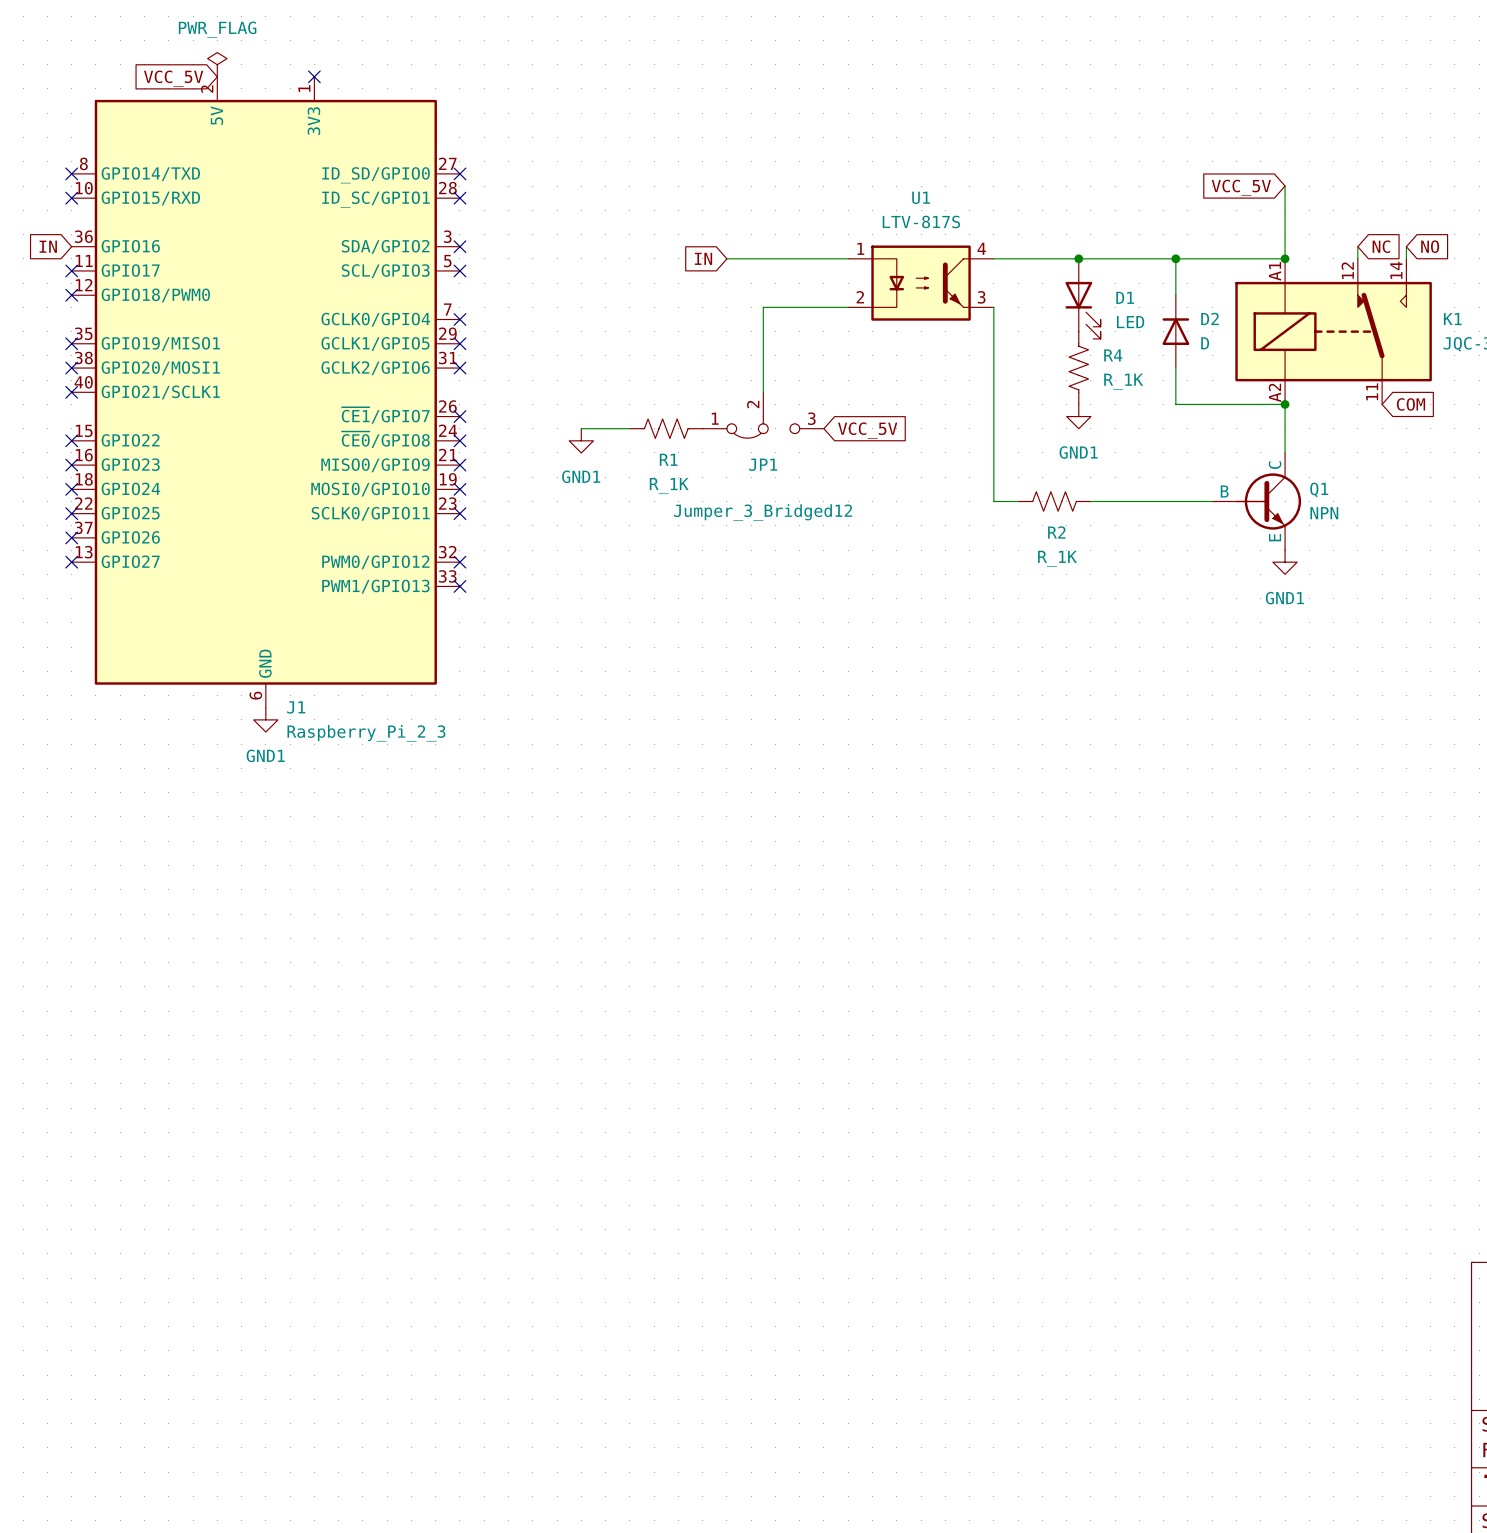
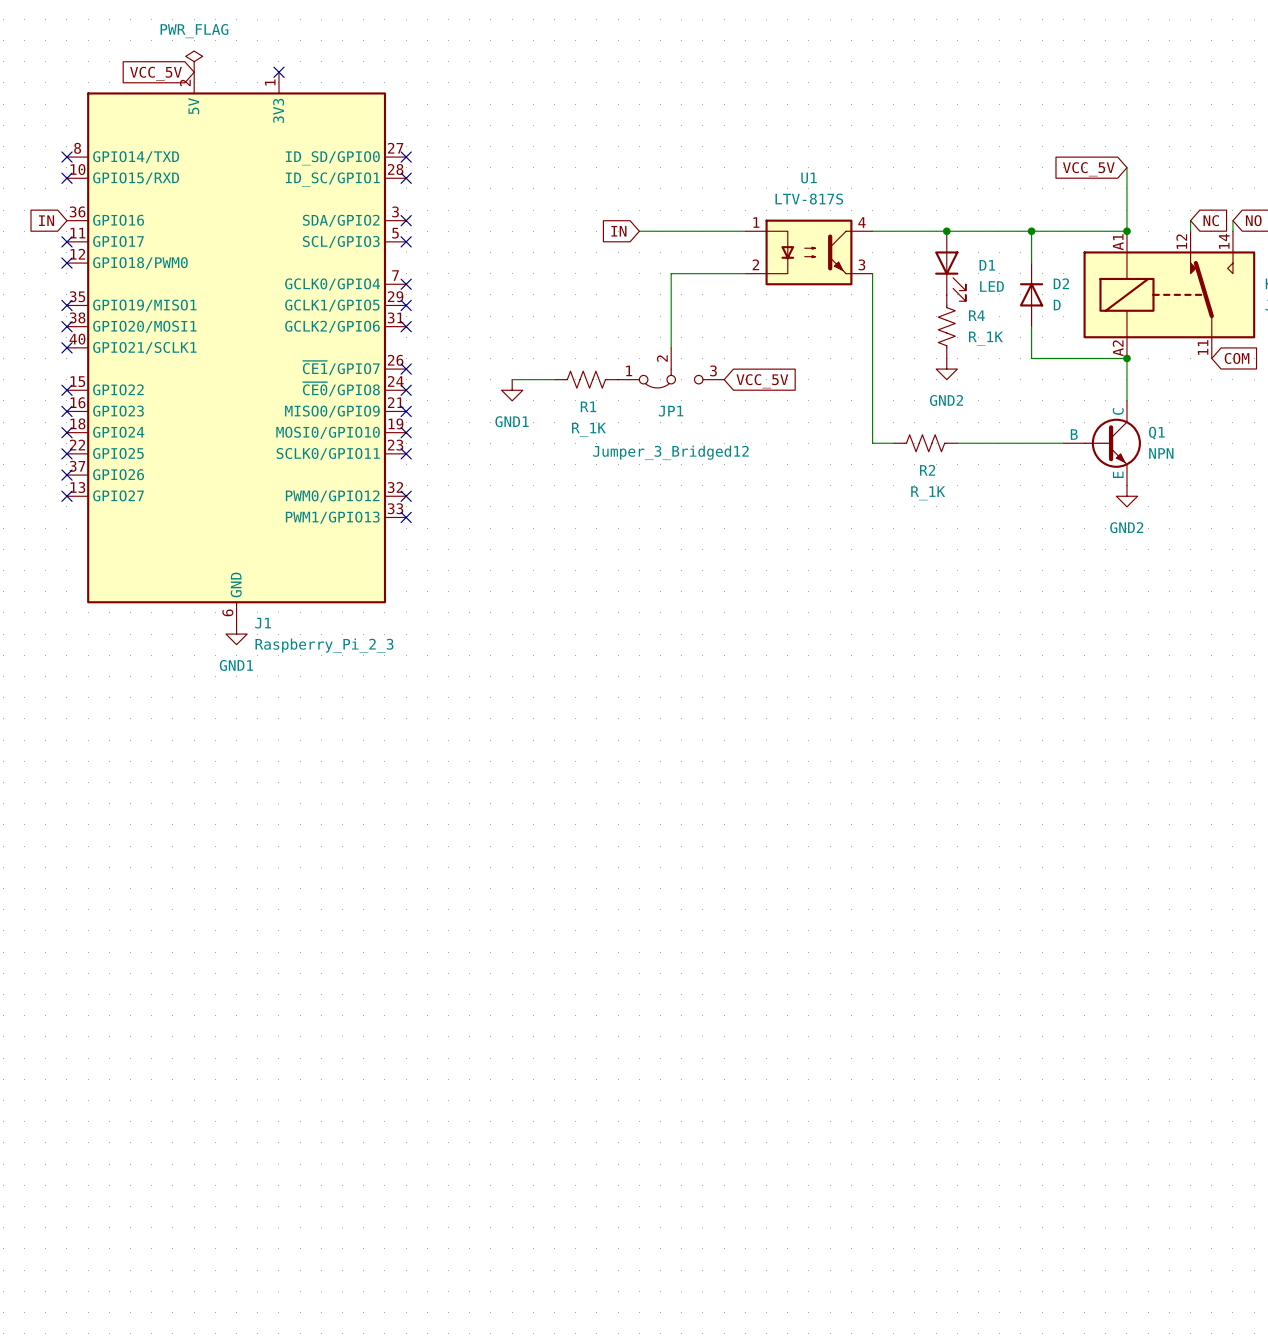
power symbol: GND1 (1078, 416) -> GND2 (946, 369)
power symbol: GND1 (1285, 562) -> GND2 (1126, 496)

